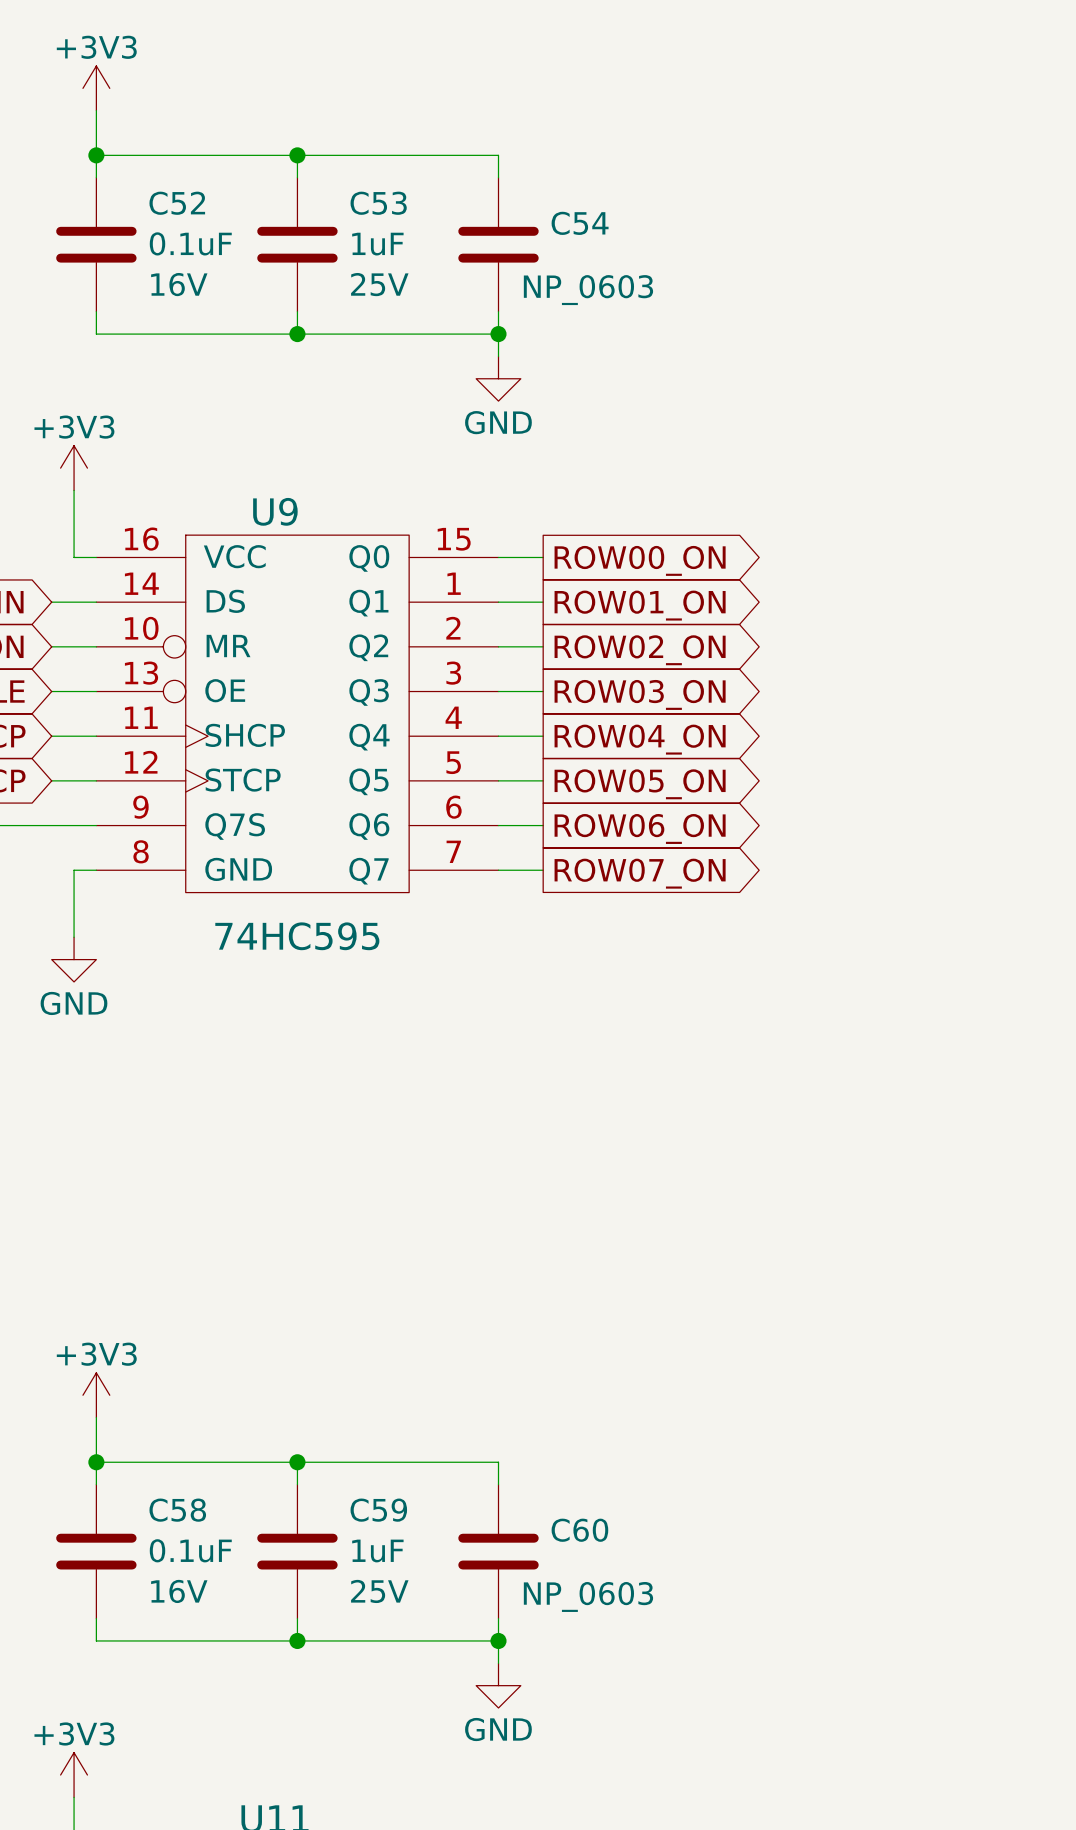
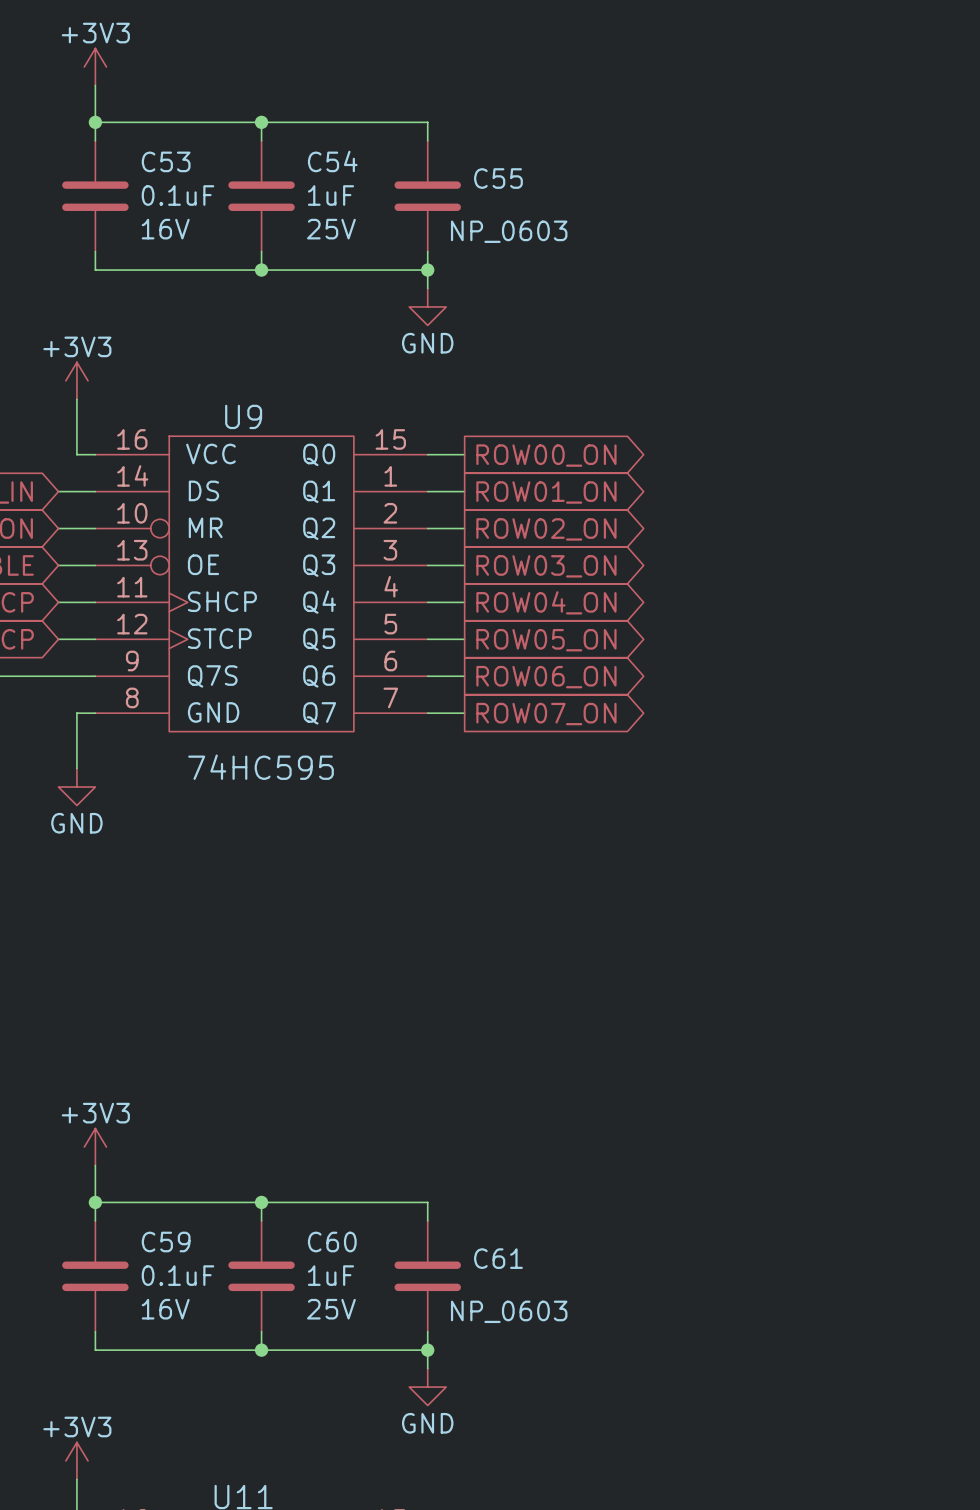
C52 name: C52 (177, 203) -> C53 (166, 161)
C53 name: C53 (378, 203) -> C54 (332, 161)
C54 name: C54 (580, 223) -> C55 (498, 178)
C58 name: C58 (177, 1510) -> C59 (166, 1241)
C59 name: C59 (378, 1510) -> C60 (332, 1241)
C60 name: C60 (579, 1530) -> C61 (498, 1258)

